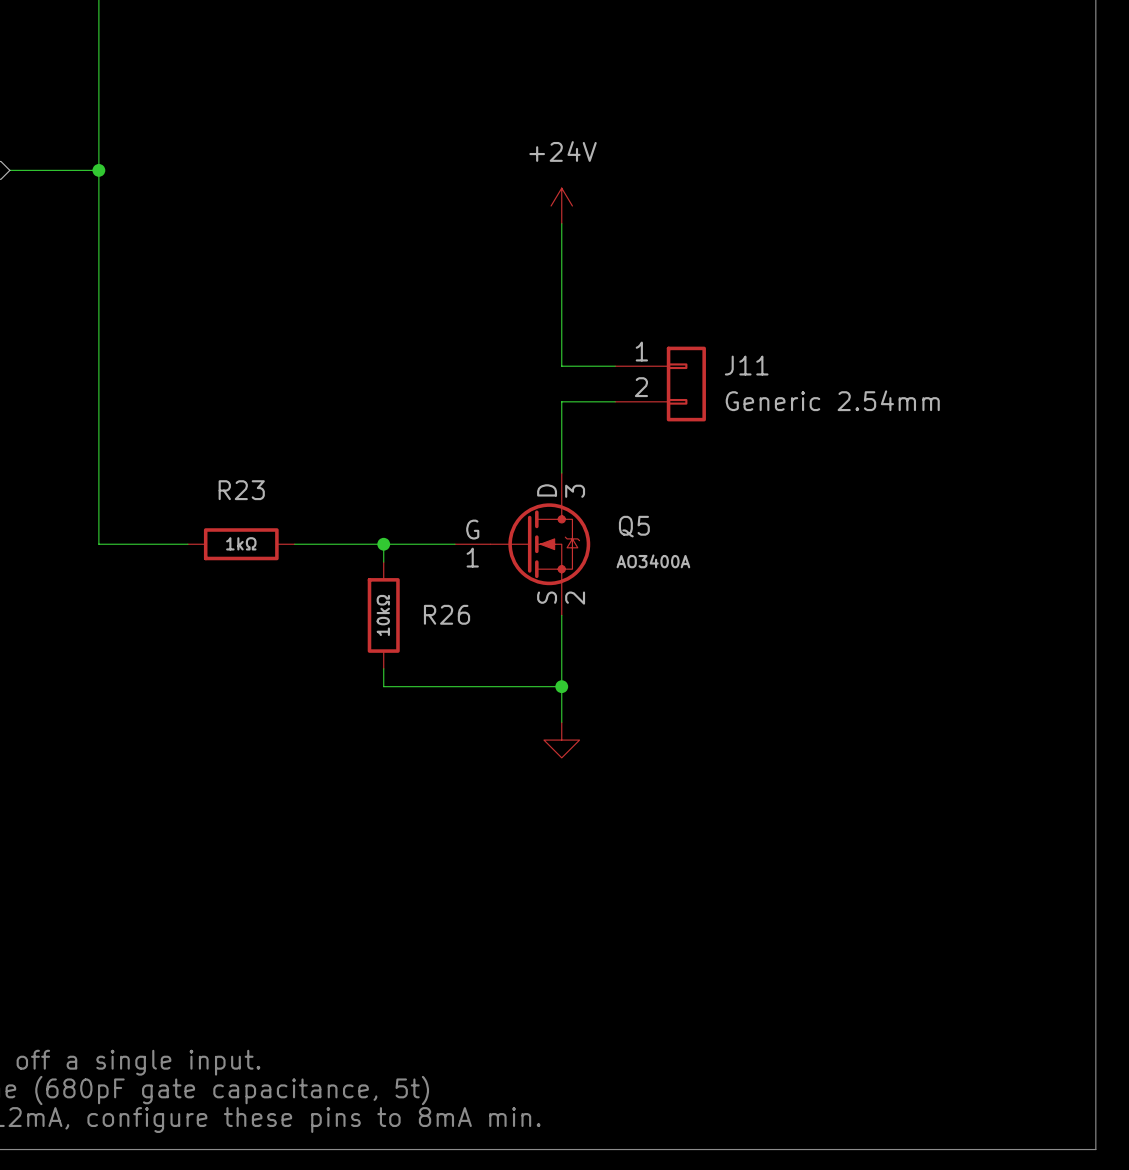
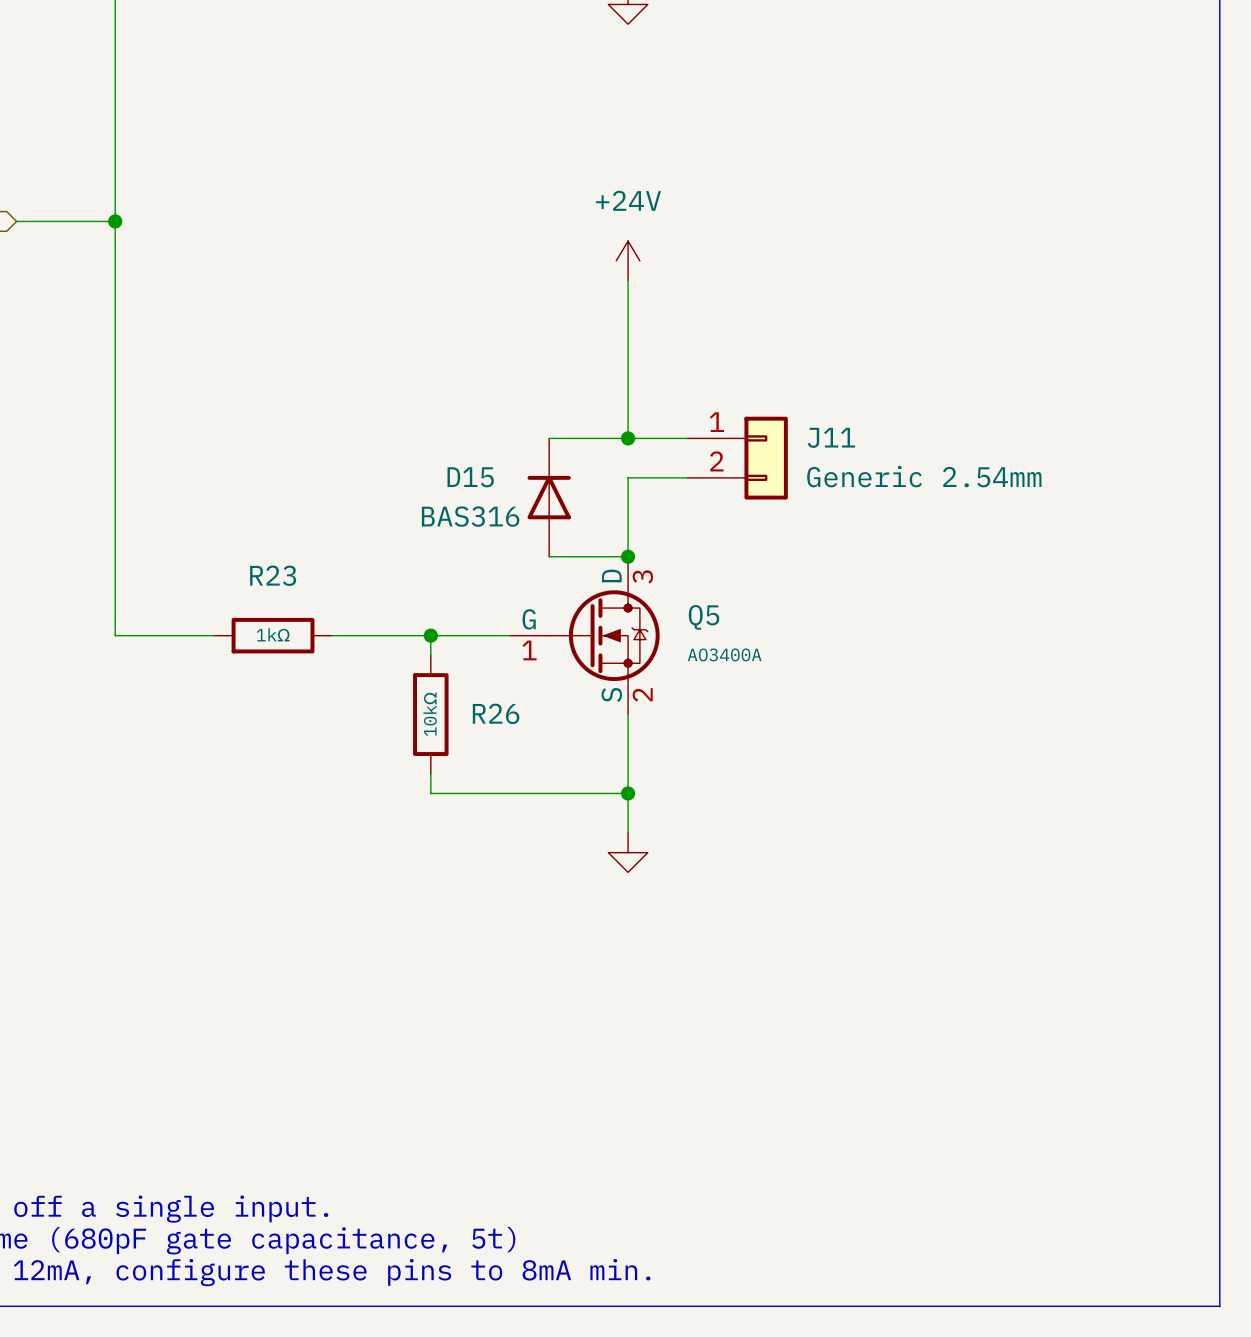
wire: none -> (549, 438) (628, 438)
junction: none -> (628, 438)
D15: none -> BAS316 (549, 497)
wire: none -> (549, 556) (628, 556)
junction: none -> (628, 556)

